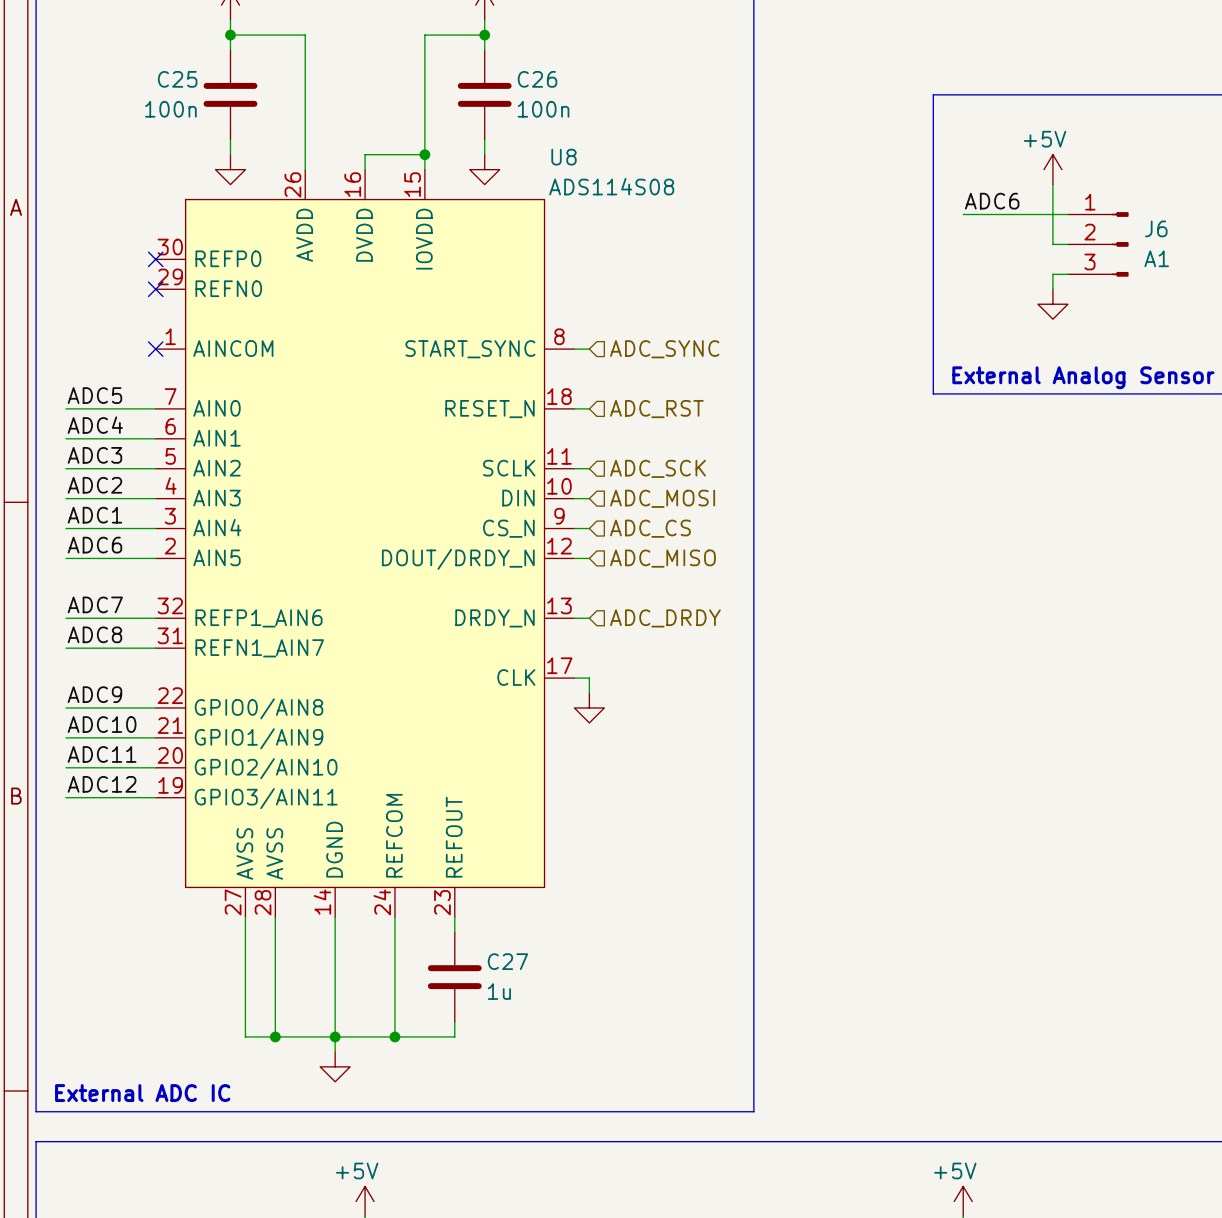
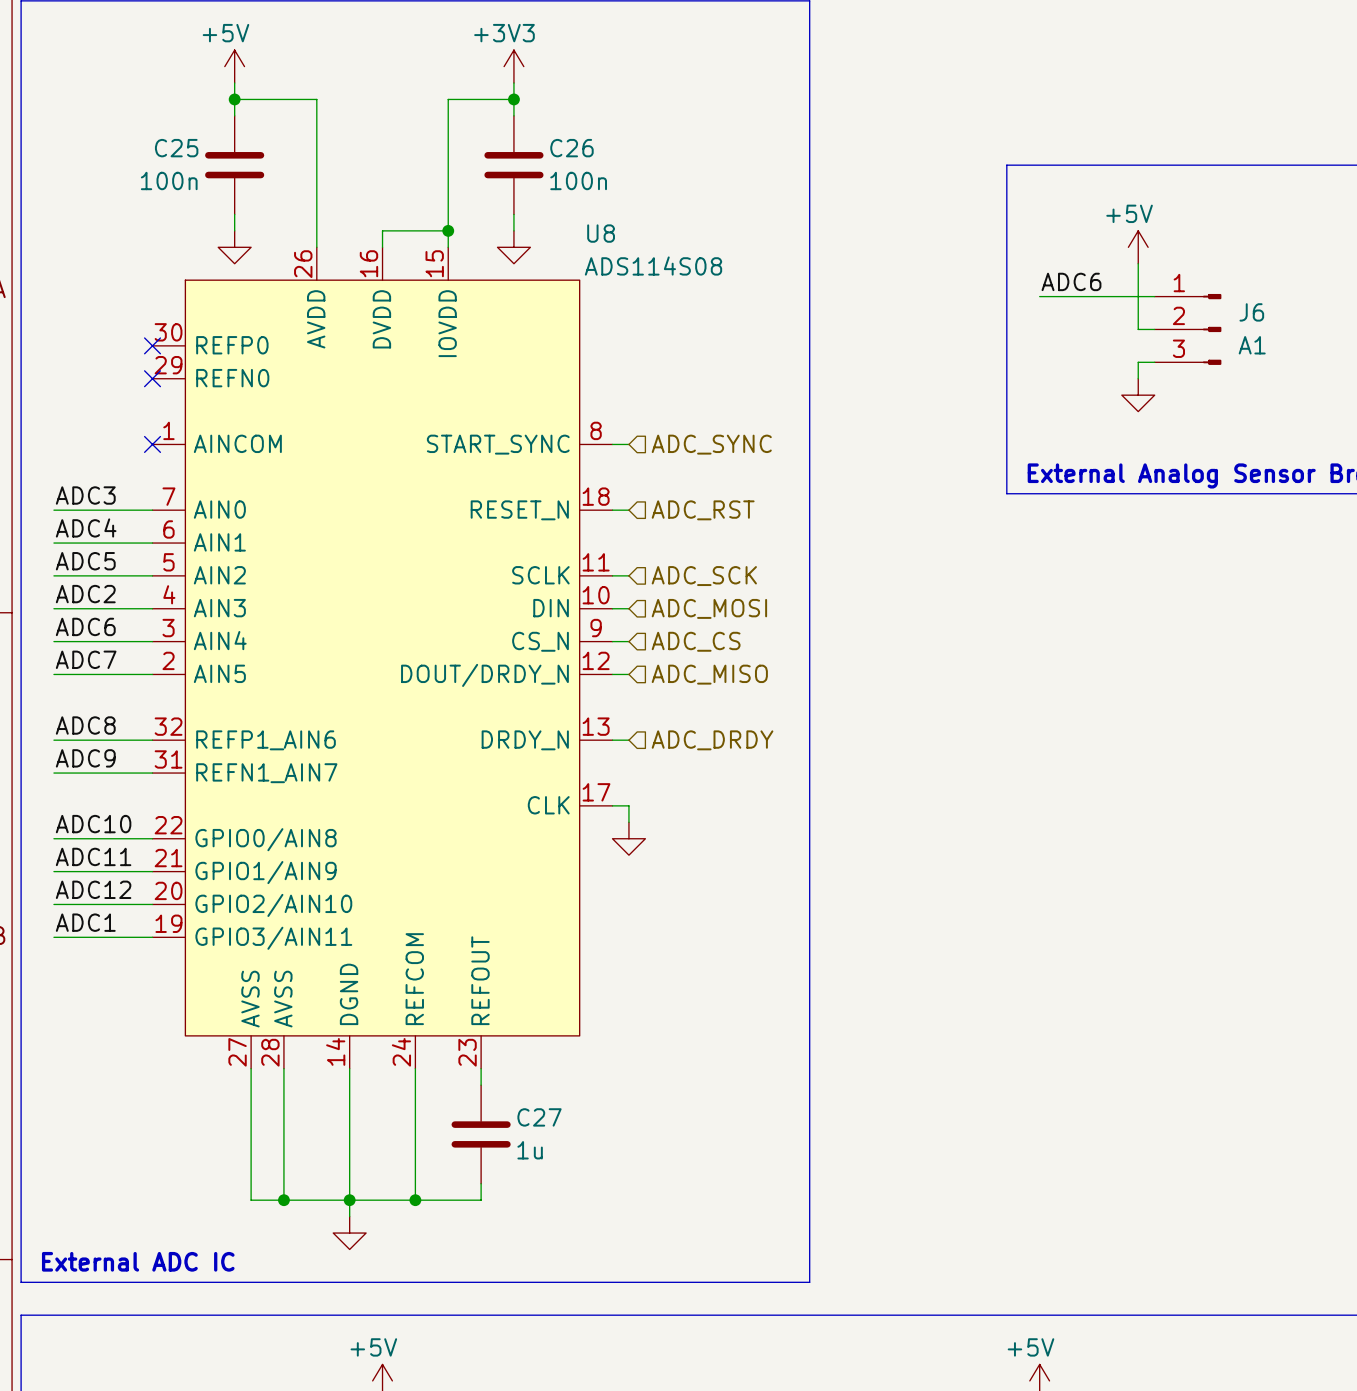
label: ADC5 (94, 395) -> ADC3 (85, 495)
label: ADC3 (94, 455) -> ADC5 (85, 561)
label: ADC1 (94, 515) -> ADC6 (85, 626)
label: ADC6 (94, 545) -> ADC7 (86, 659)
label: ADC7 (95, 604) -> ADC8 (85, 725)
label: ADC8 (94, 634) -> ADC9 (85, 758)
label: ADC9 (94, 694) -> ADC10 (93, 824)
label: ADC10 (102, 724) -> ADC11 (93, 856)
label: ADC11 (102, 754) -> ADC12 (93, 889)
label: ADC12 (102, 784) -> ADC1 (85, 922)

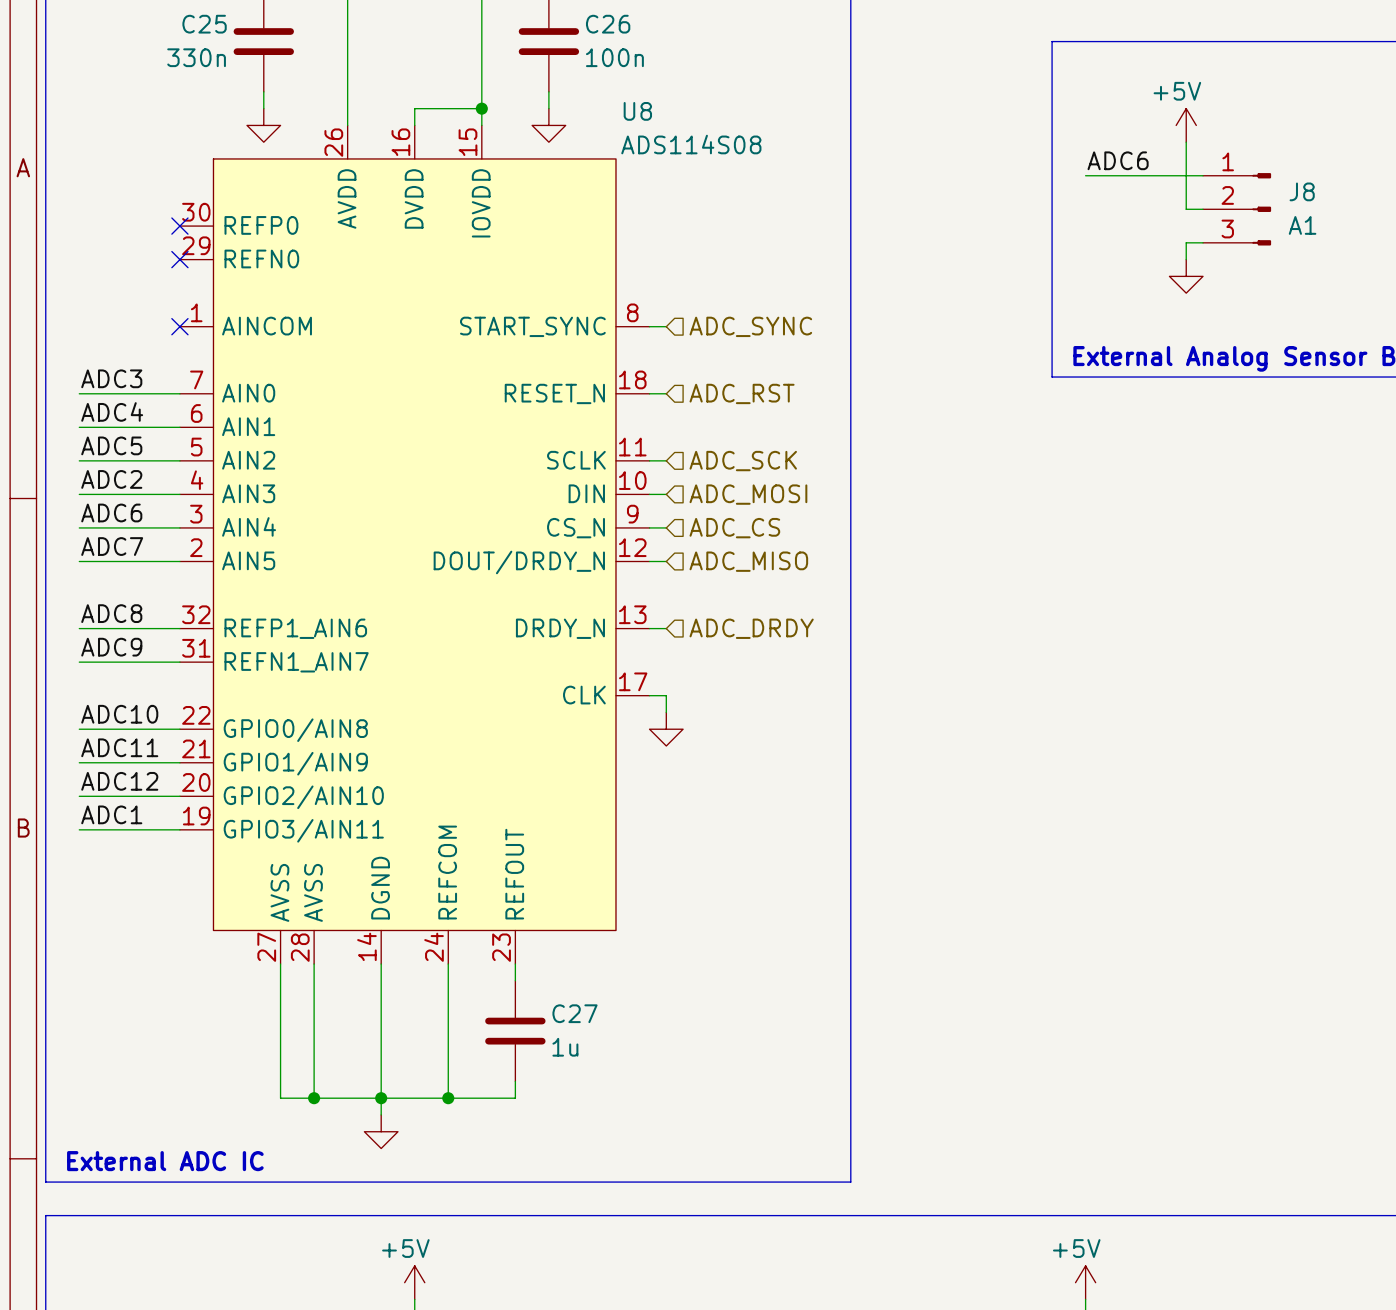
C25 value: 100n (169, 180) -> 330n (196, 57)
J6 name: J6 (1251, 312) -> J8 (1302, 191)

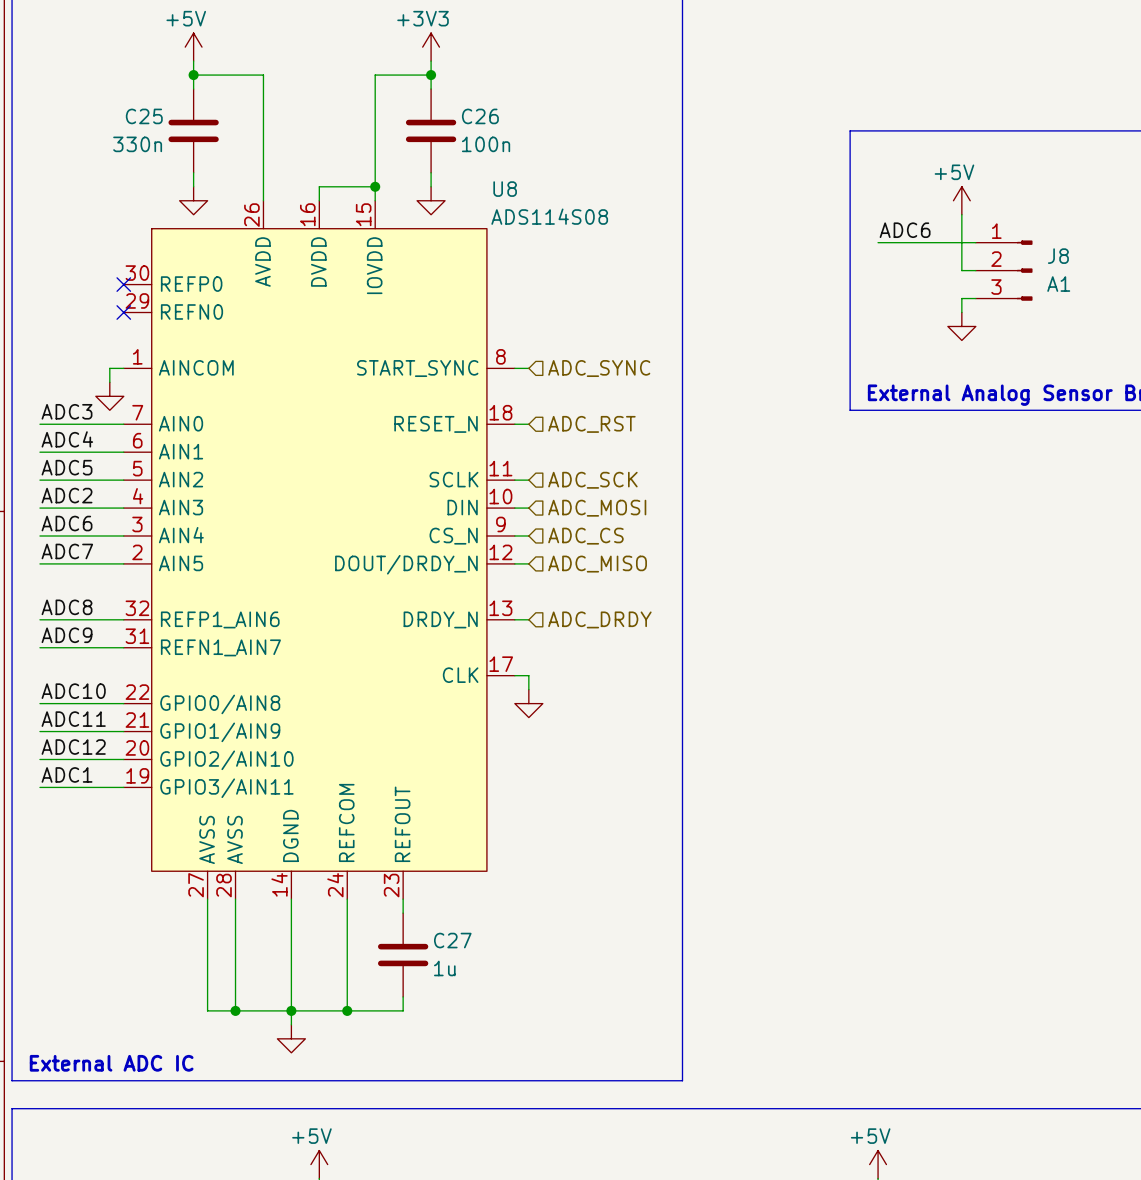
wire: none -> (123, 368) (109, 368) (109, 382)
no-connect mark: (179, 326) -> none
power symbol: none -> (109, 396)

